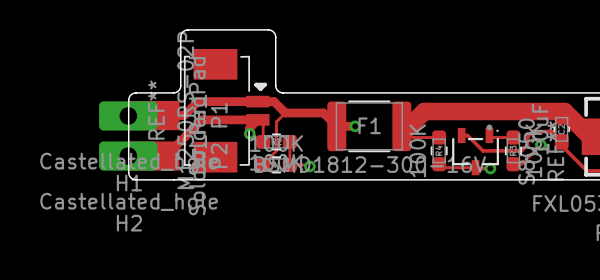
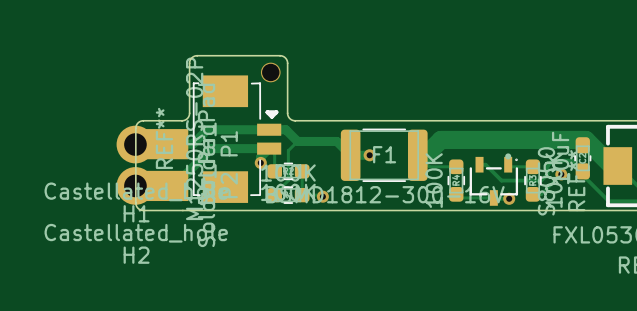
via: none -> (270, 72)
H1 footprint: [99, 101, 158, 131] -> [116, 125, 155, 164]
H2 footprint: [99, 141, 158, 171] -> [116, 167, 155, 205]

